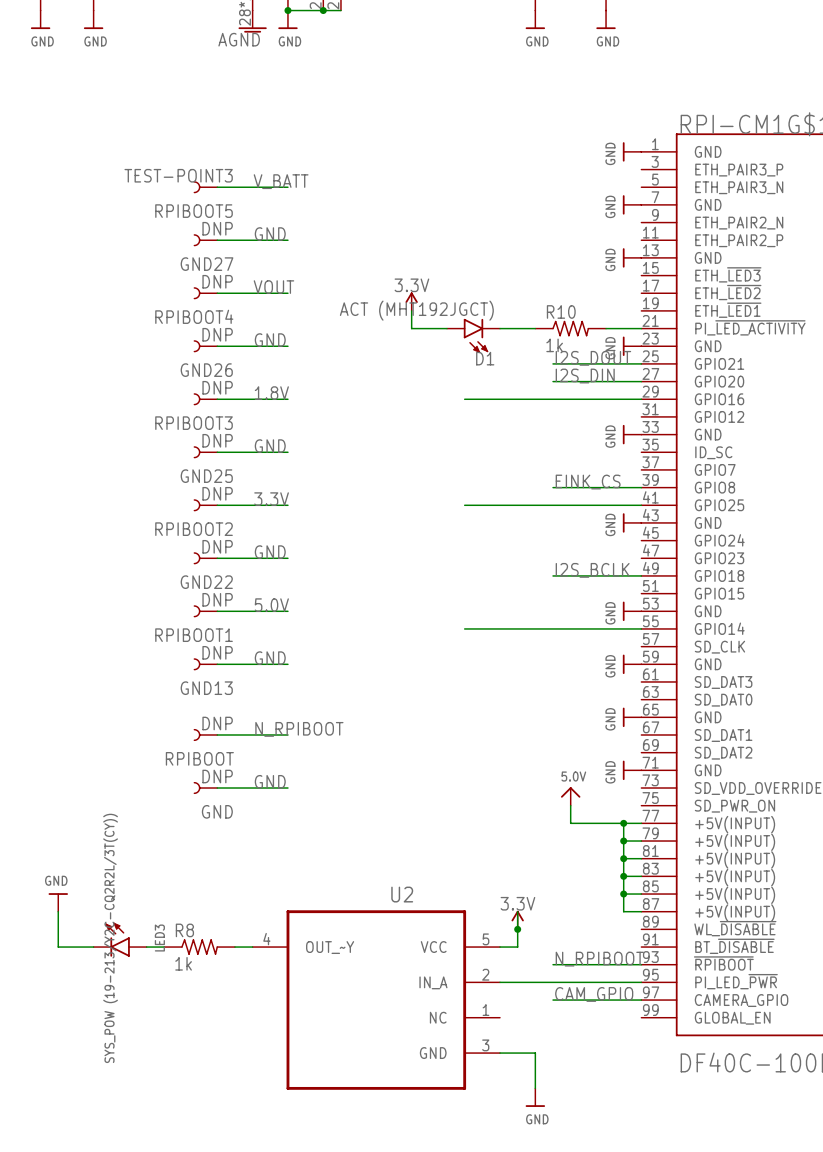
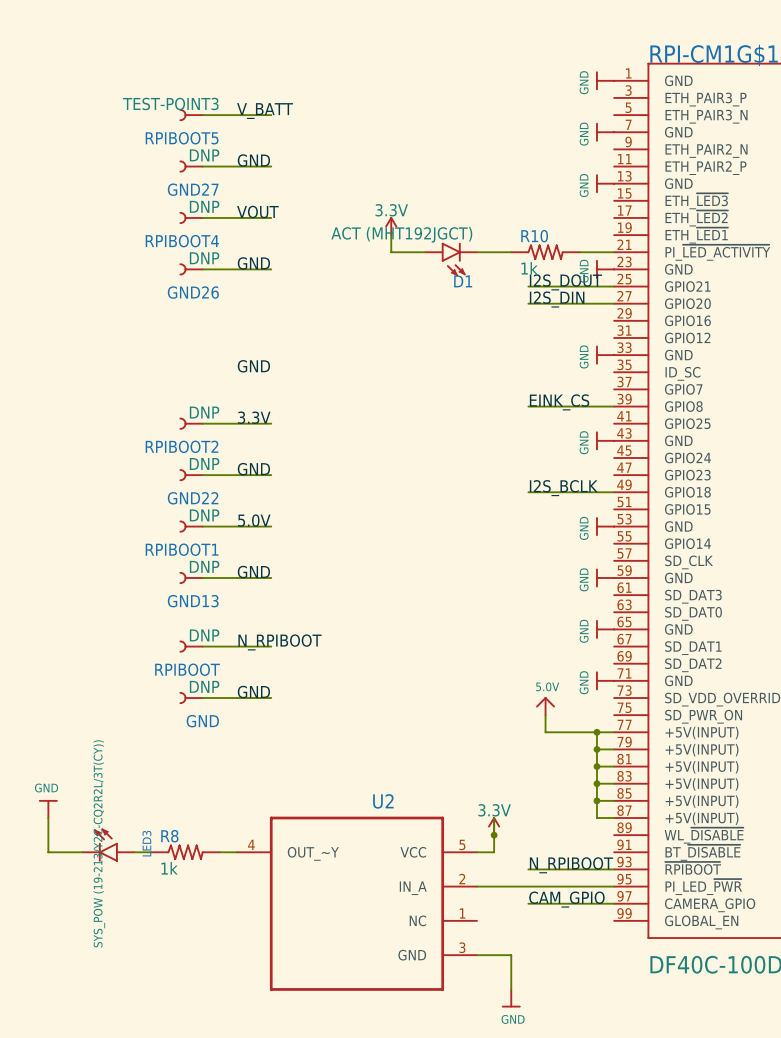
label: 1.8V (271, 393) -> none
RPIBOOT3: DNP (205, 399) -> none
wire: (217, 399) (287, 399) -> none
wire: (464, 399) (641, 399) -> none
GND25: DNP (205, 452) -> none
wire: (217, 452) (287, 452) -> none
wire: (464, 505) (641, 505) -> none
wire: (464, 628) (641, 628) -> none

